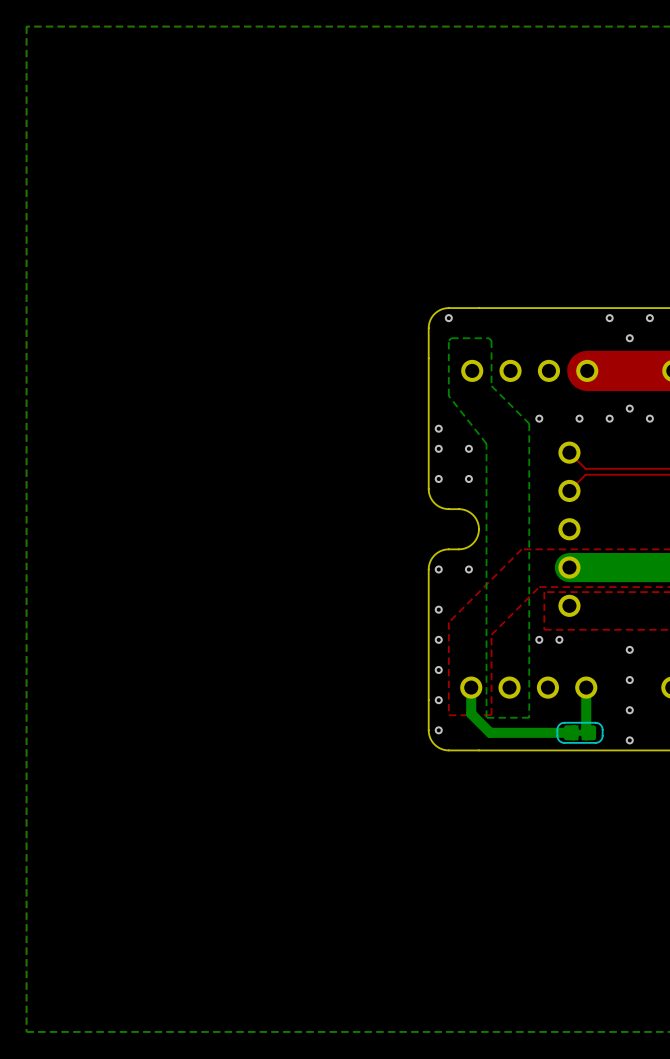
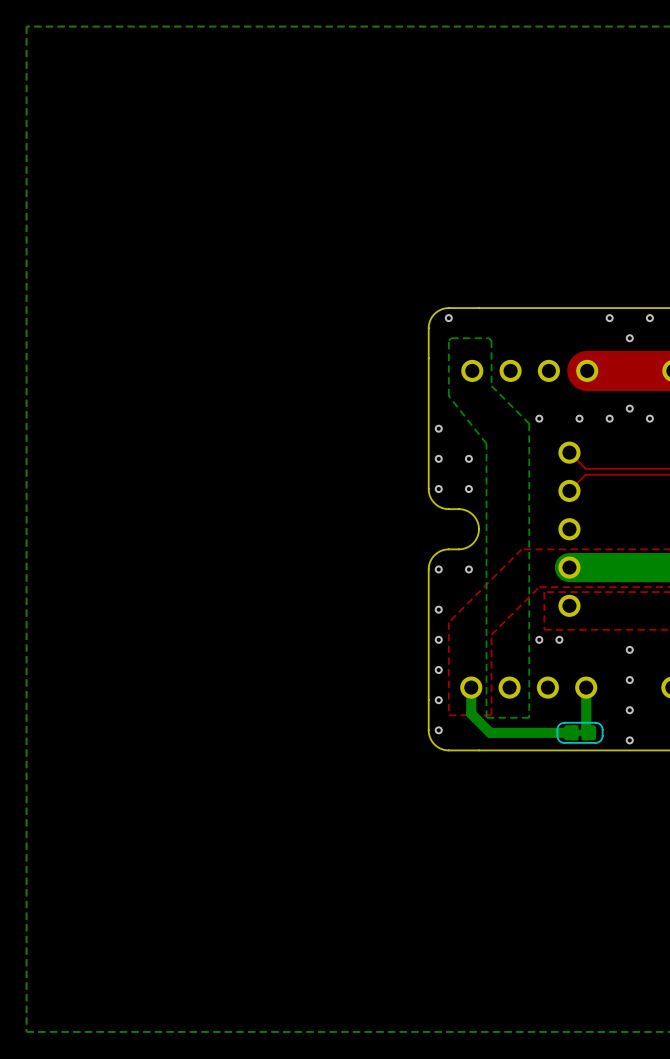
via: (438, 448) -> none
via: (468, 448) -> none
via: none -> (438, 458)
via: none -> (468, 458)
via: (438, 478) -> none
via: (468, 478) -> none
via: none -> (438, 489)
via: none -> (468, 489)

